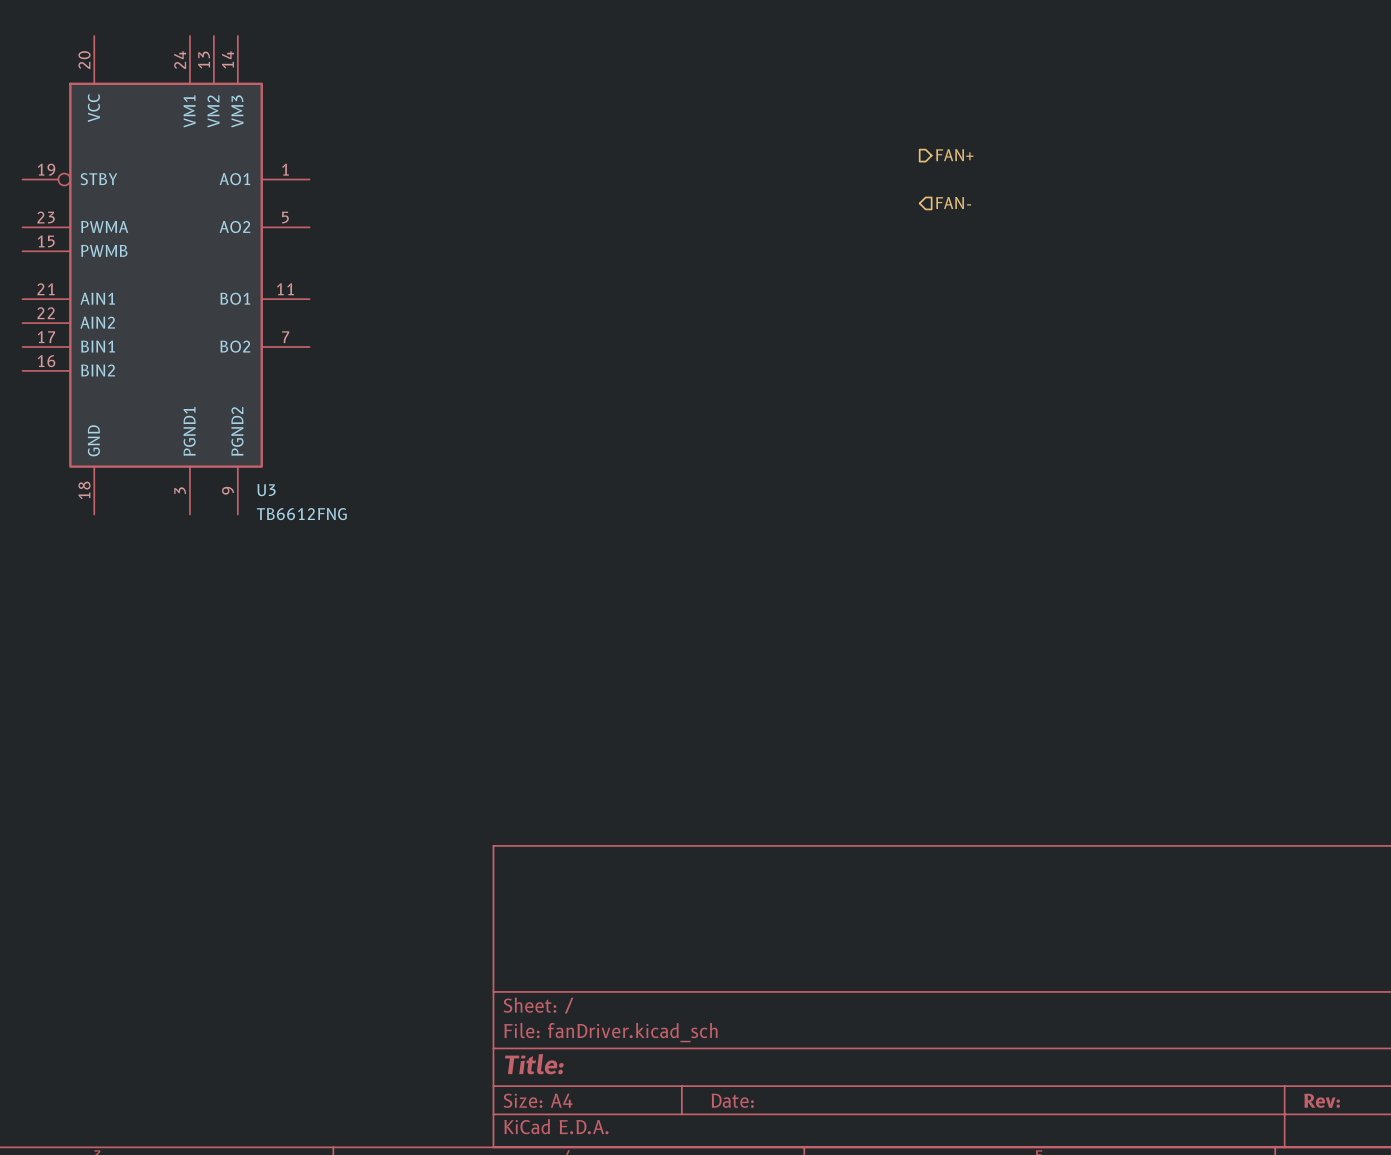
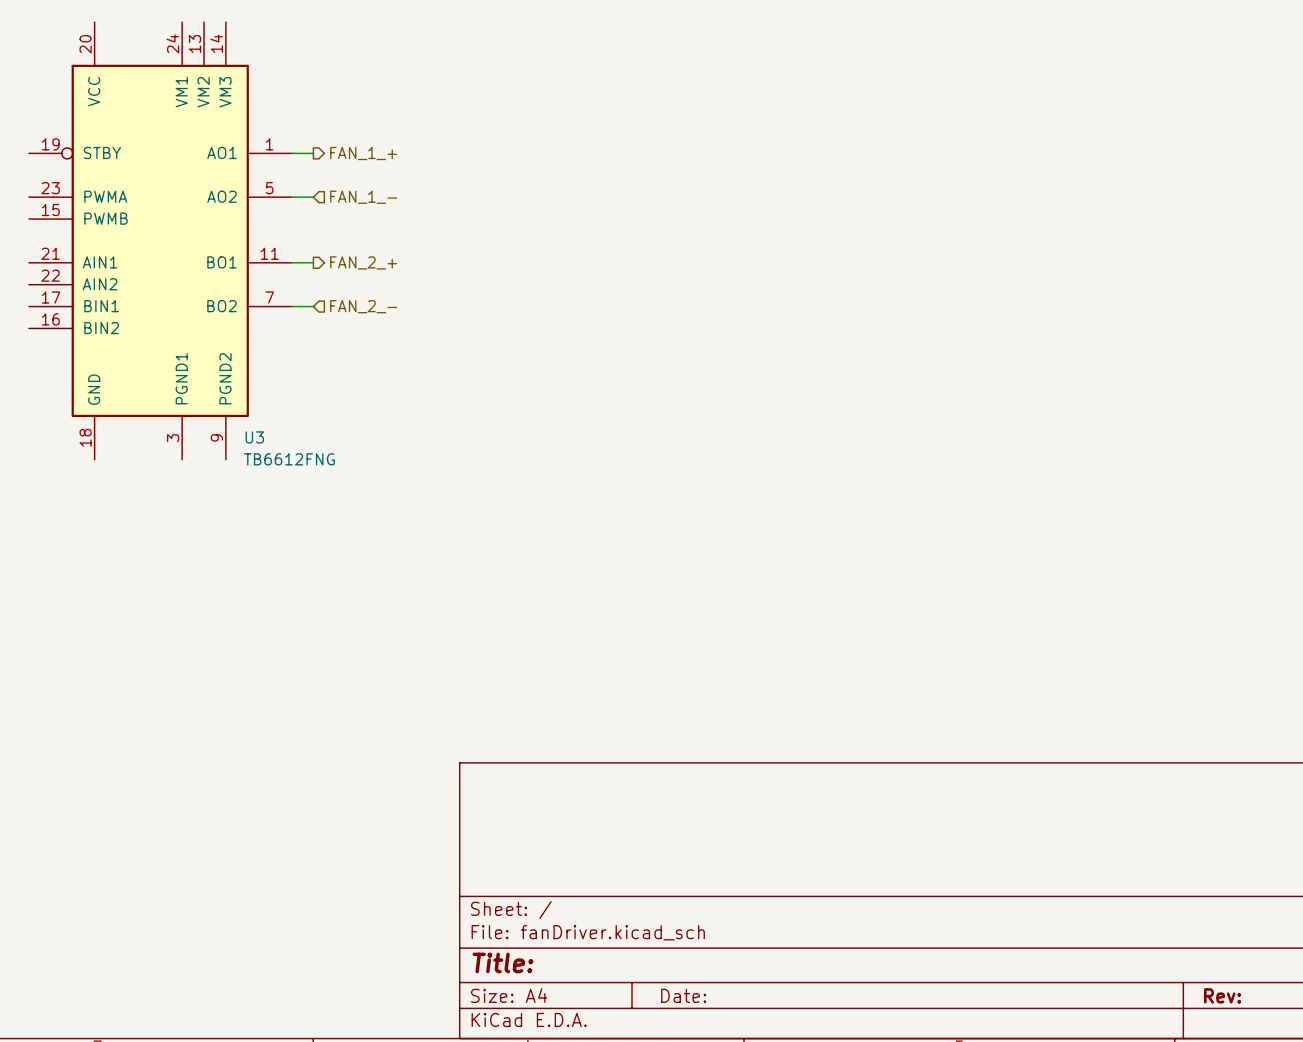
hierarchical label: FAN+ (954, 155) -> none
wire: none -> (291, 153) (313, 153)
hierarchical label: none -> FAN_1_+ (363, 153)
hierarchical label: FAN- (953, 203) -> none
wire: none -> (291, 197) (313, 197)
hierarchical label: none -> FAN_1_- (363, 197)
wire: none -> (291, 262) (313, 262)
hierarchical label: none -> FAN_2_+ (363, 262)
wire: none -> (291, 306) (313, 306)
hierarchical label: none -> FAN_2_- (363, 306)

